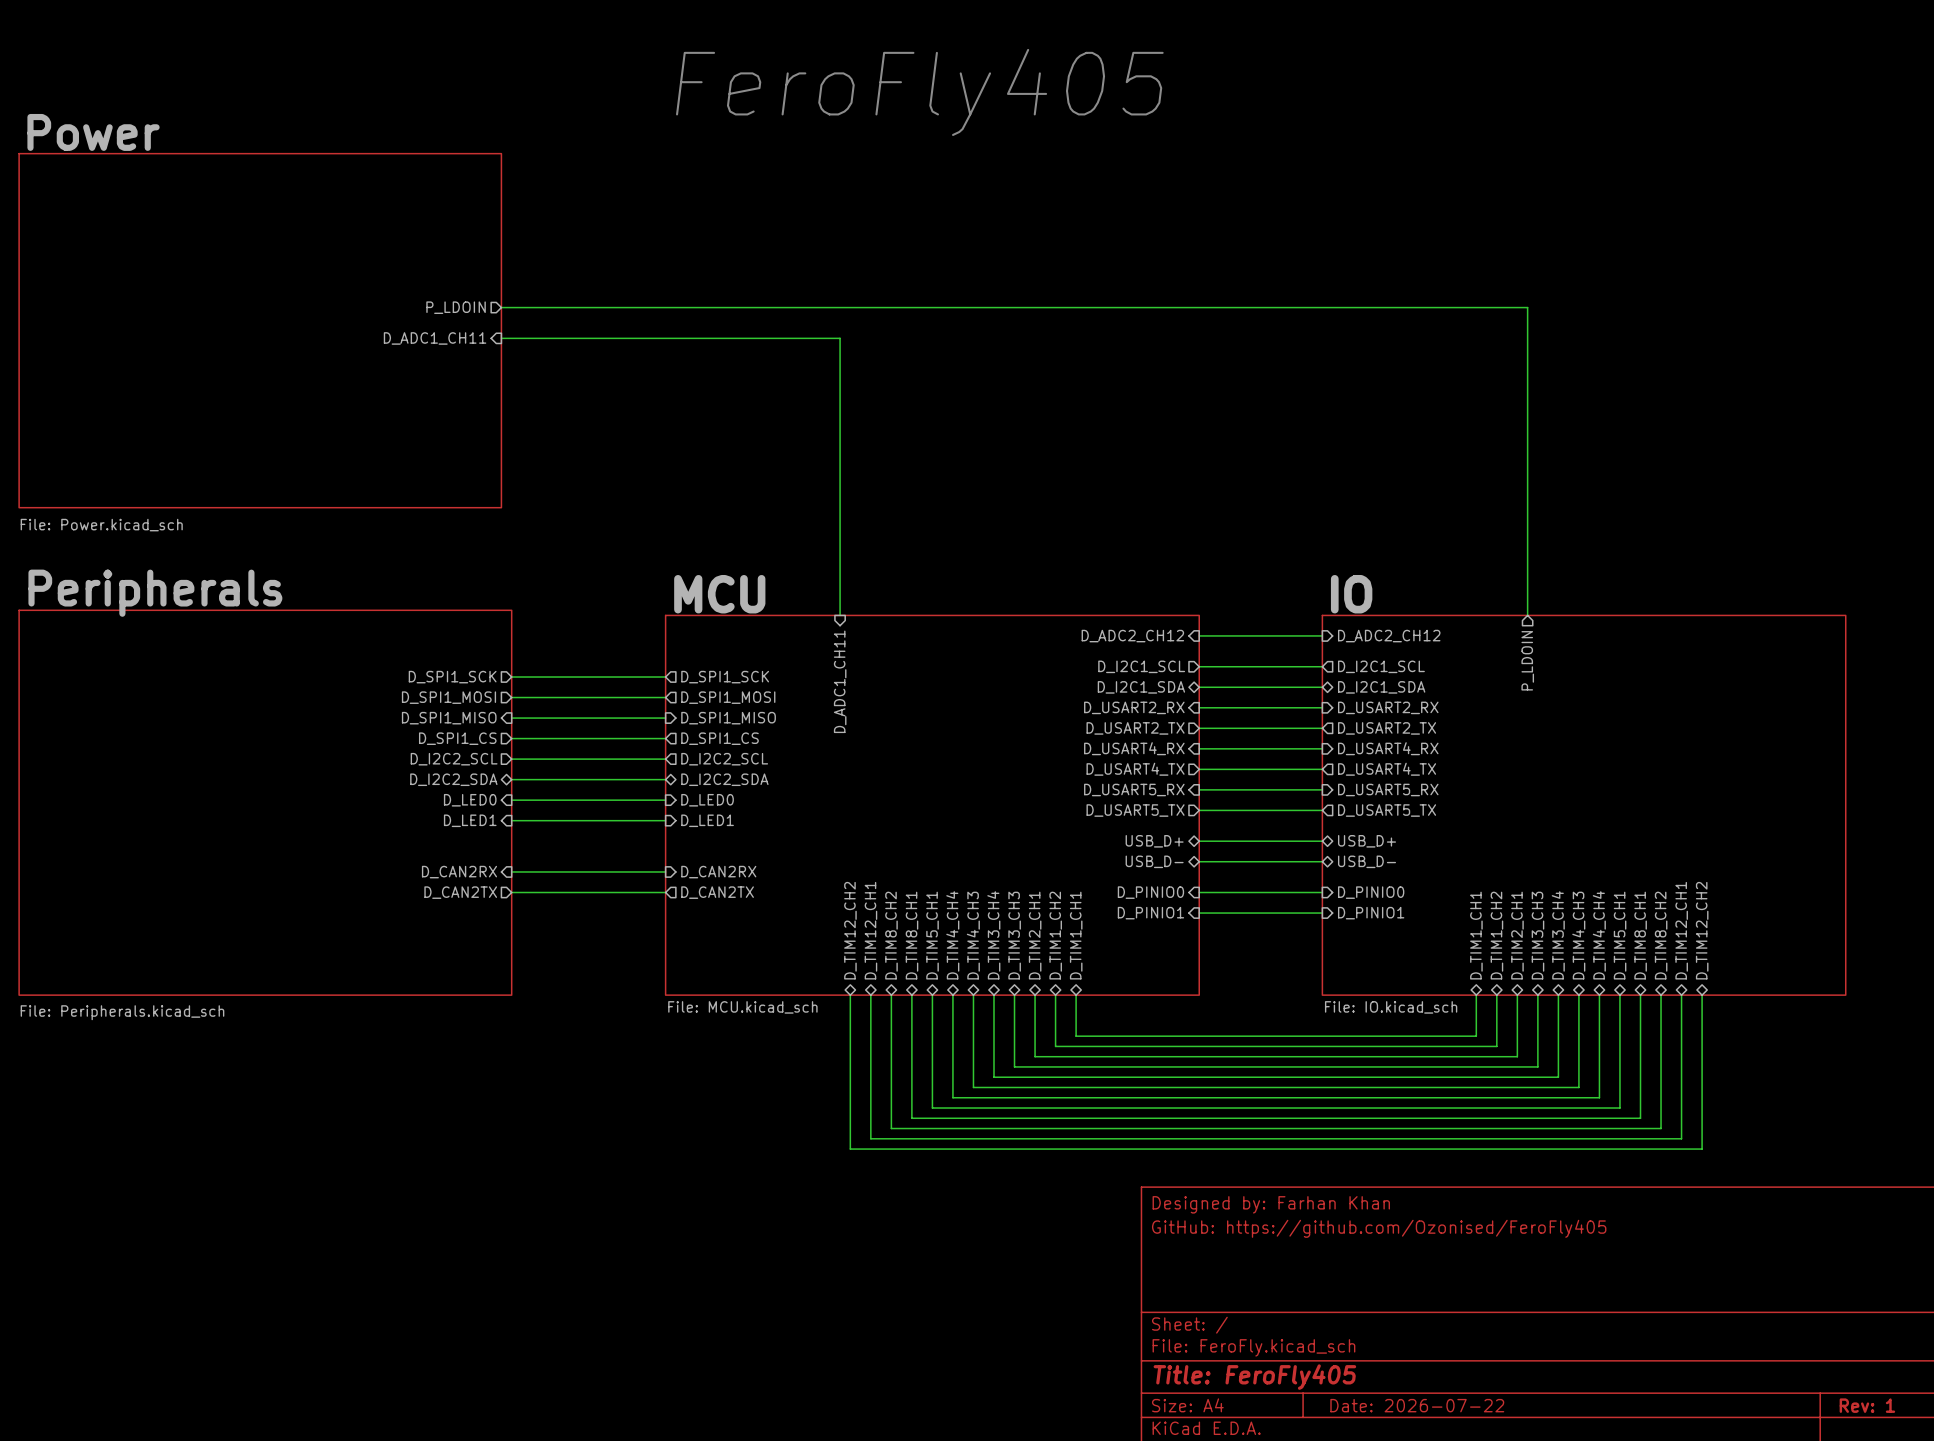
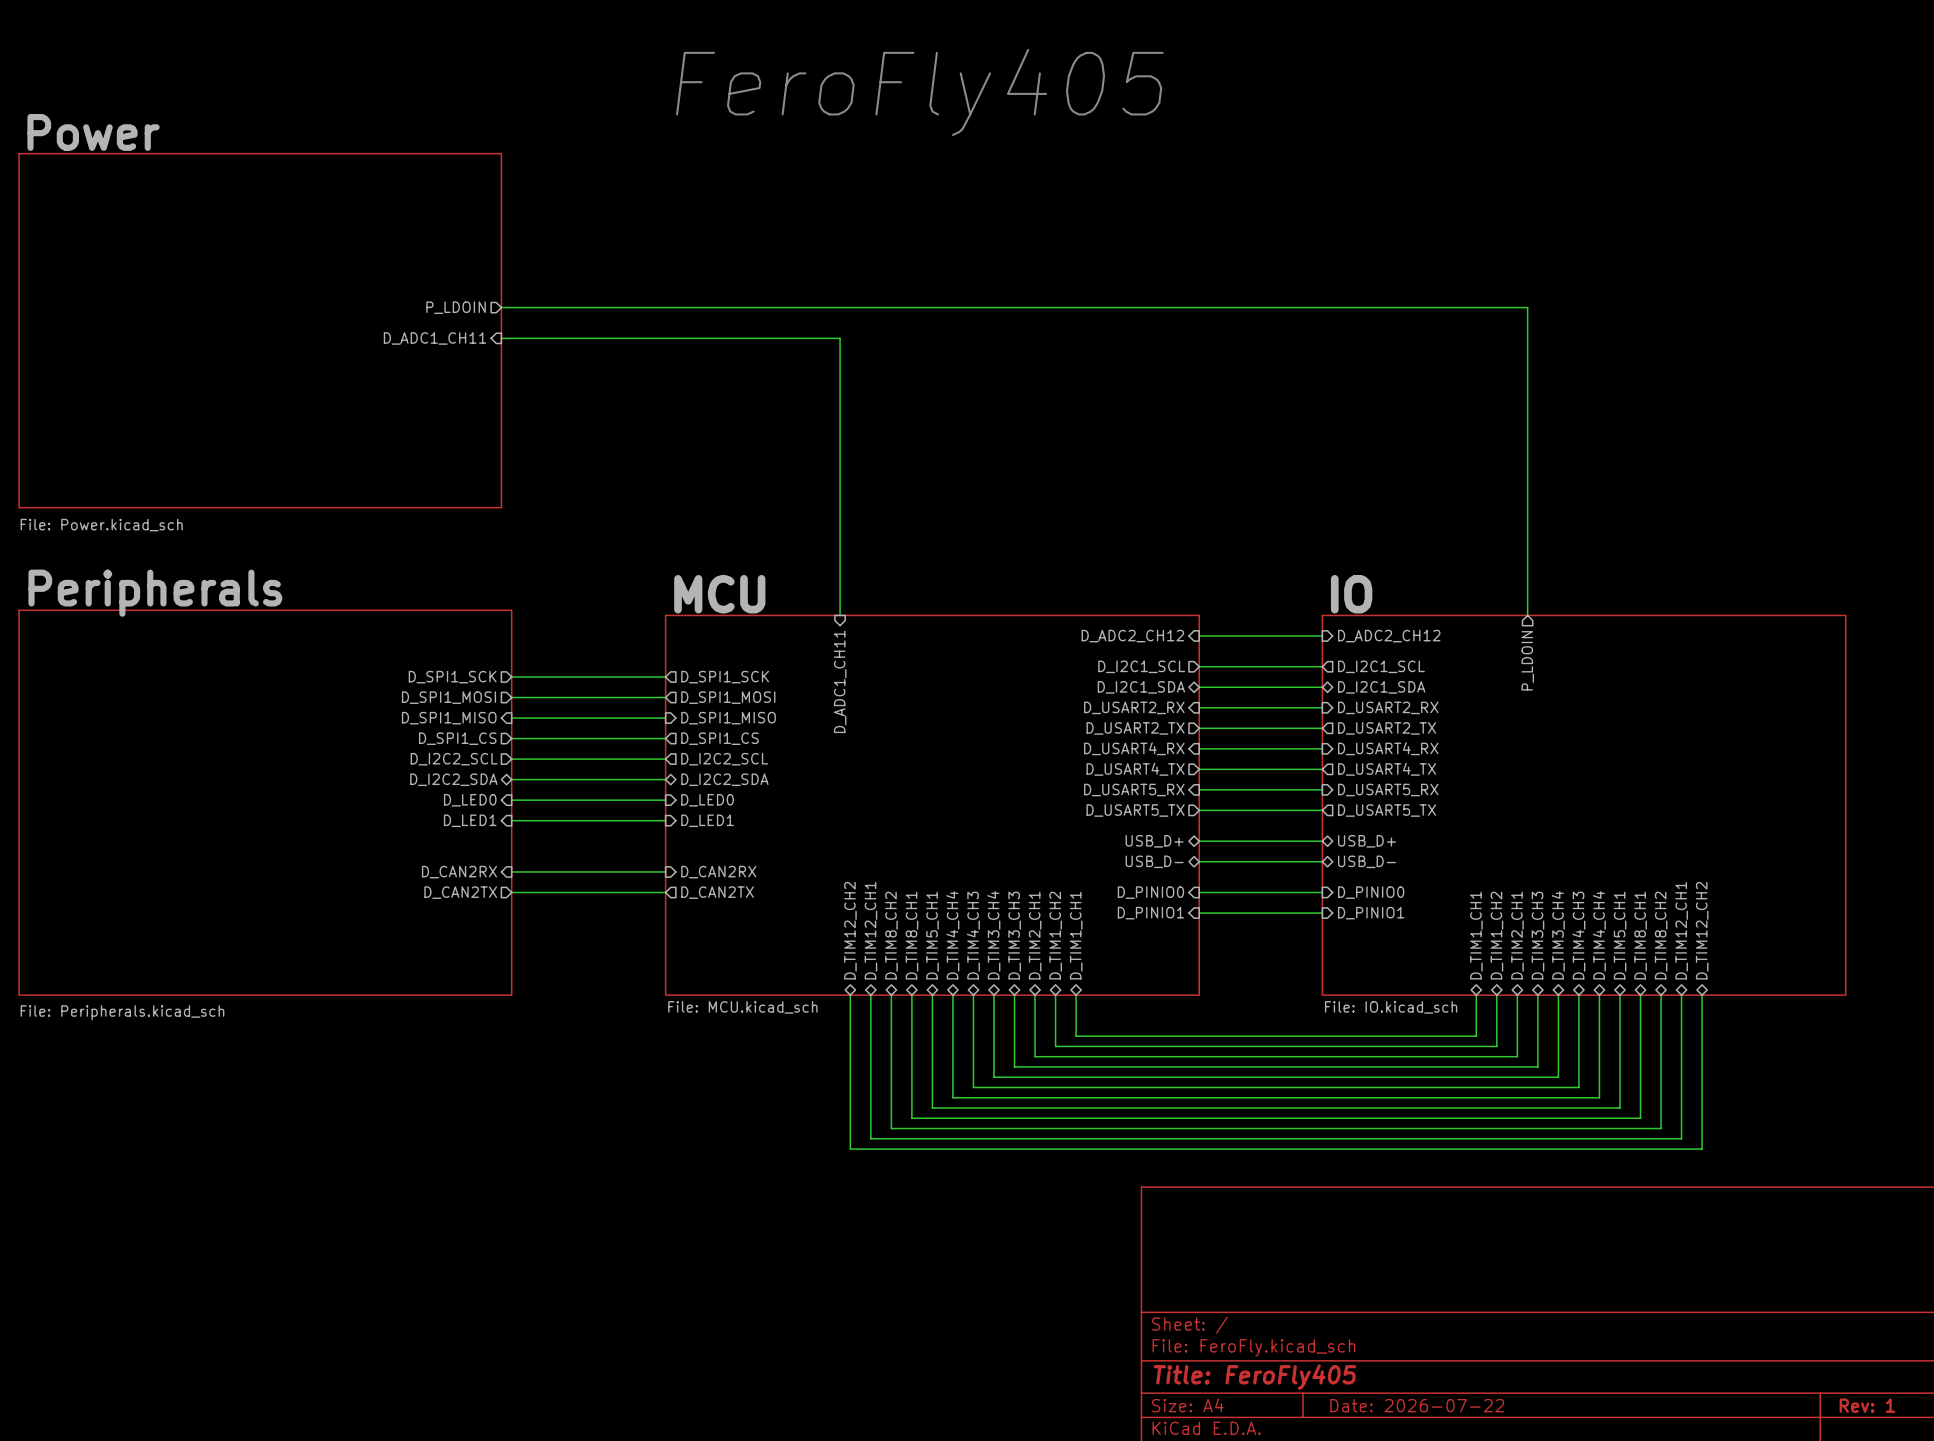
title block: Designed by: Farhan Khan (1271, 1204) -> none
title block: GitHub: https://github.com/Ozonised/FeroFly405 (1379, 1228) -> none

